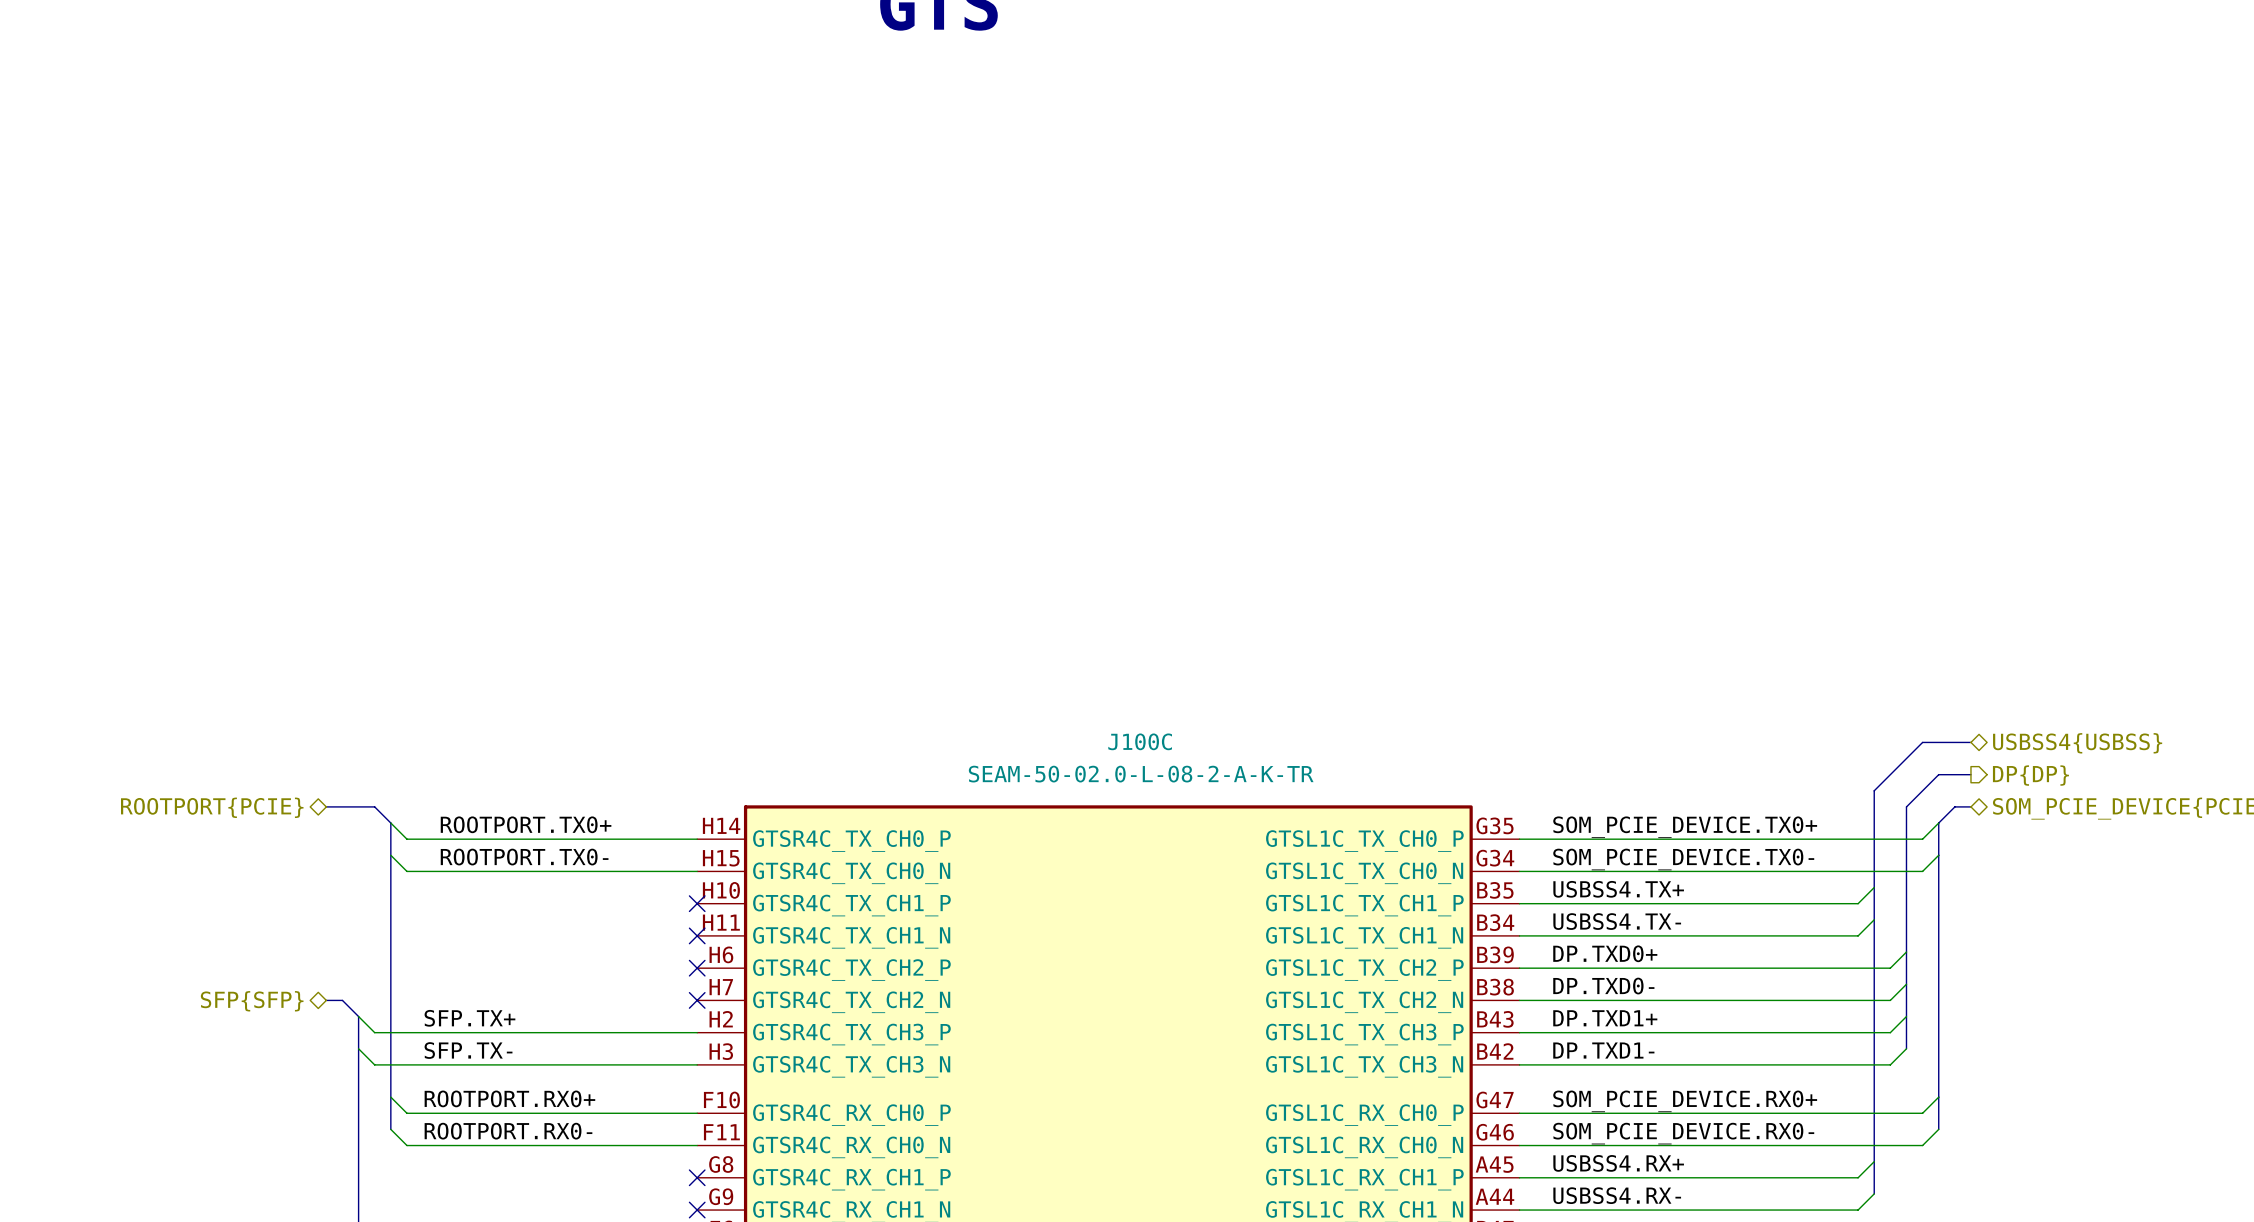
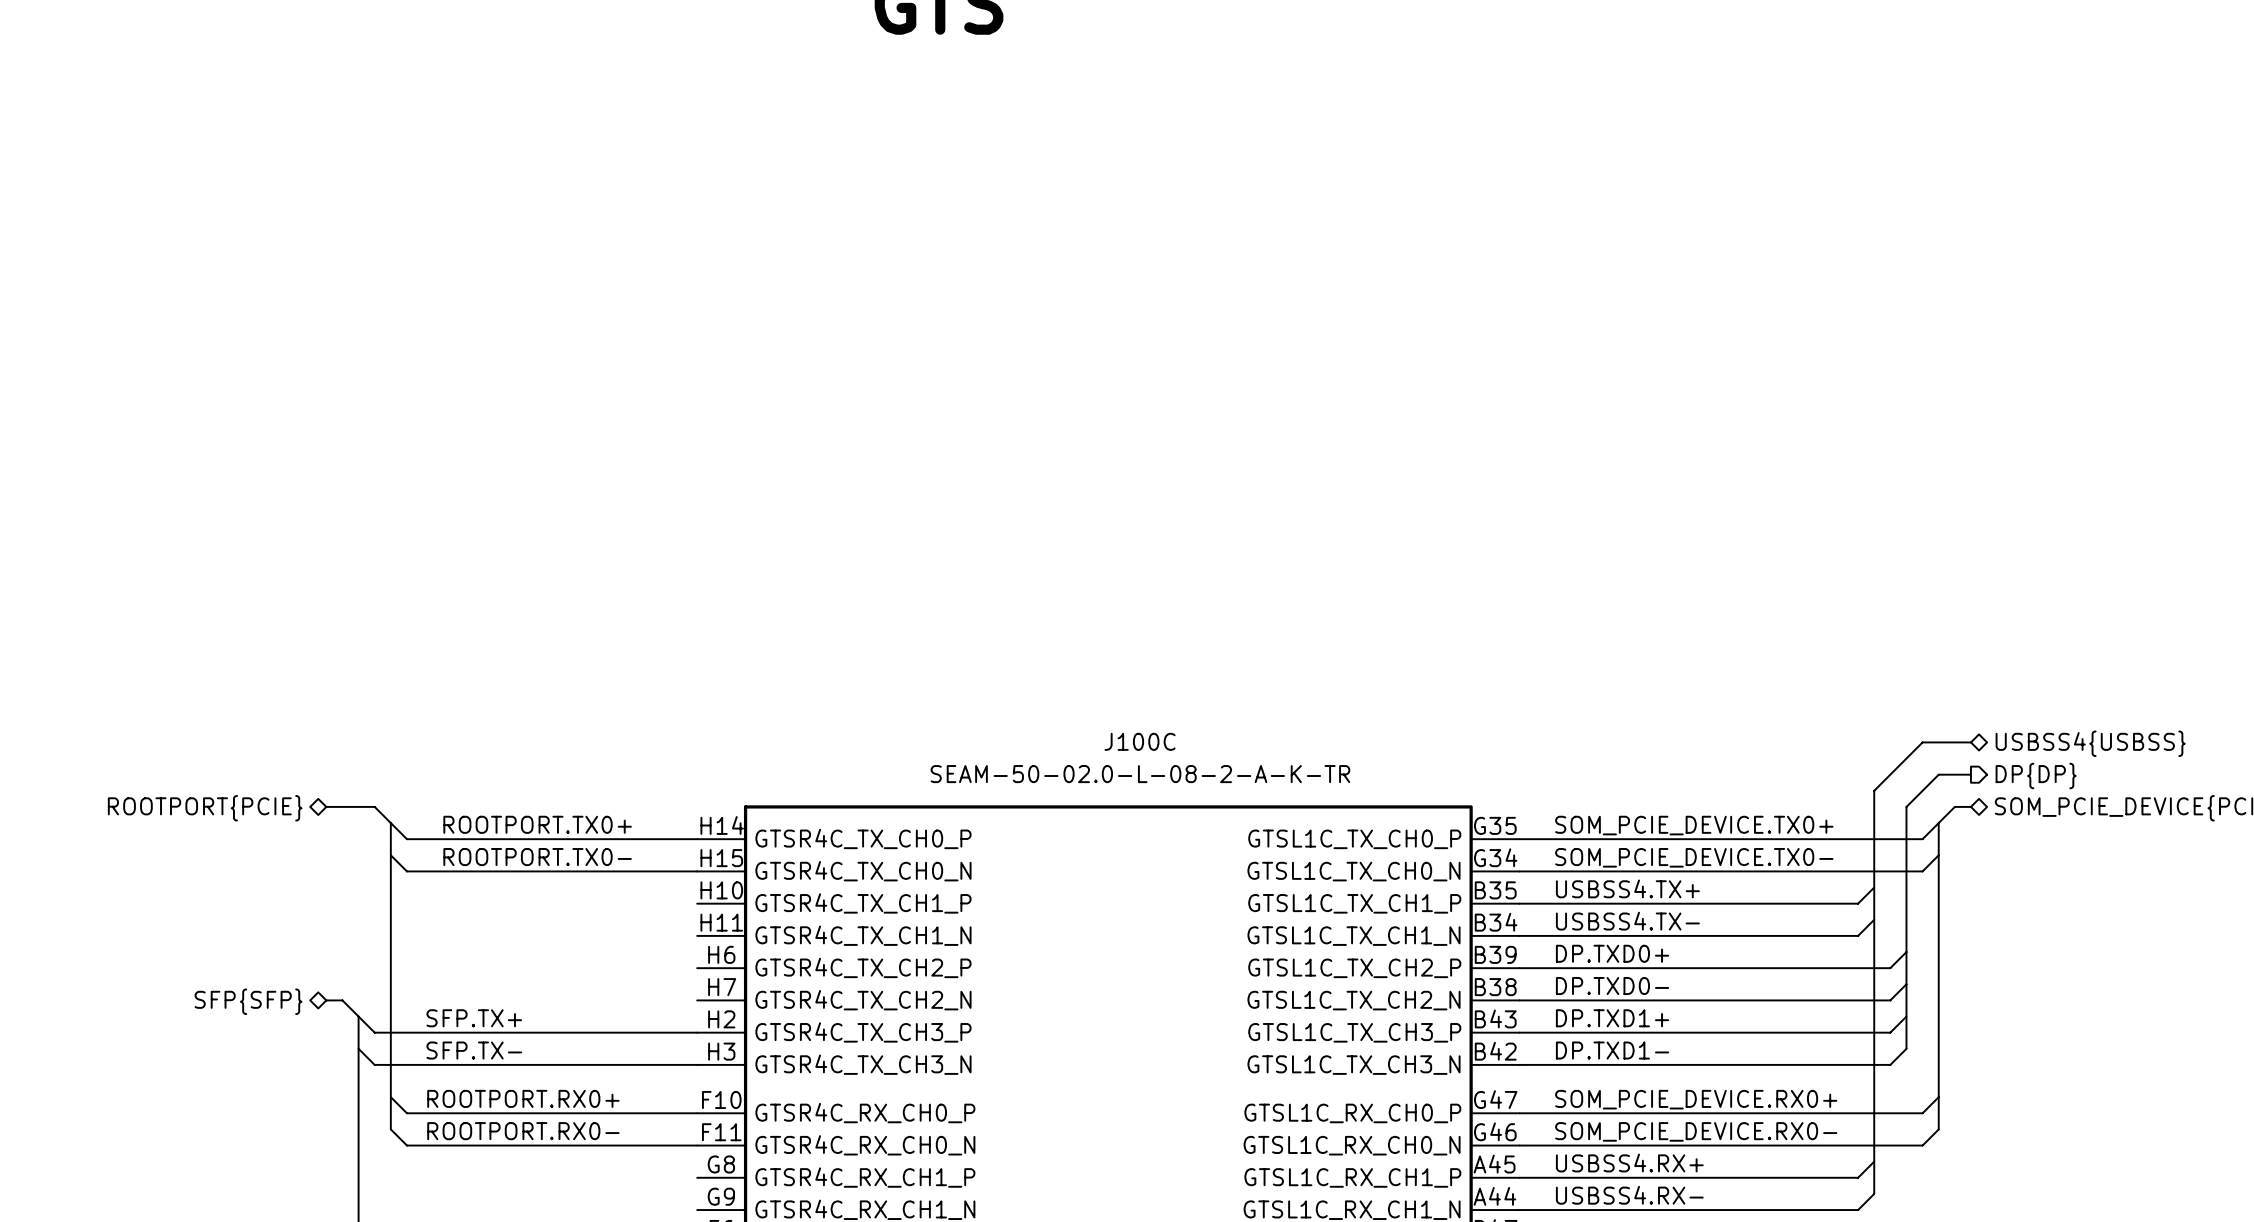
no-connect mark: (697, 903) -> none
no-connect mark: (697, 935) -> none
no-connect mark: (697, 968) -> none
no-connect mark: (697, 1000) -> none
no-connect mark: (697, 1177) -> none
no-connect mark: (697, 1210) -> none

